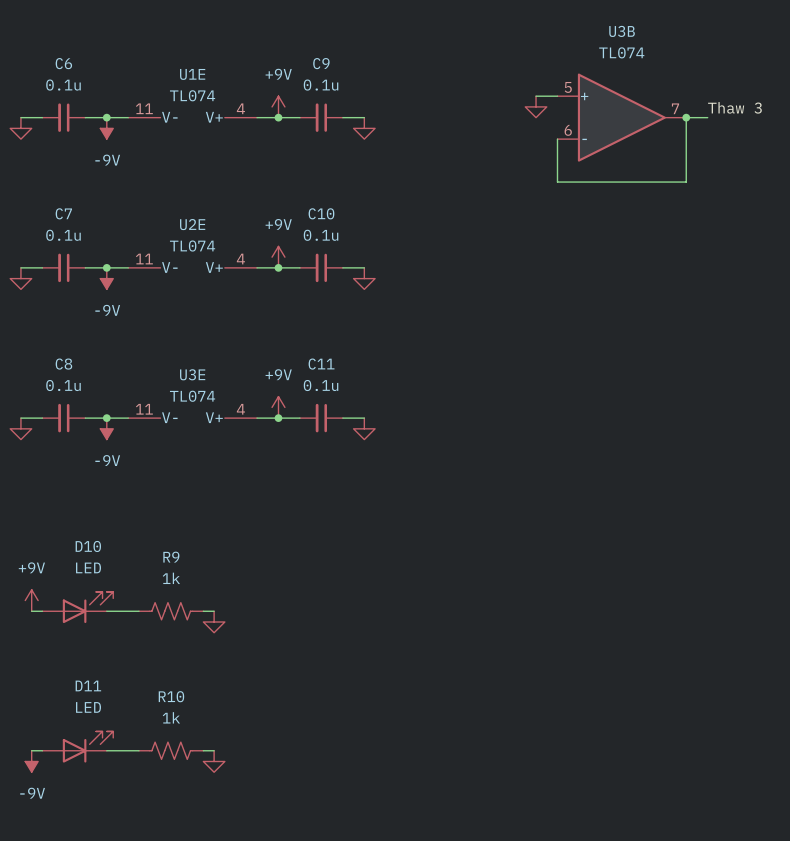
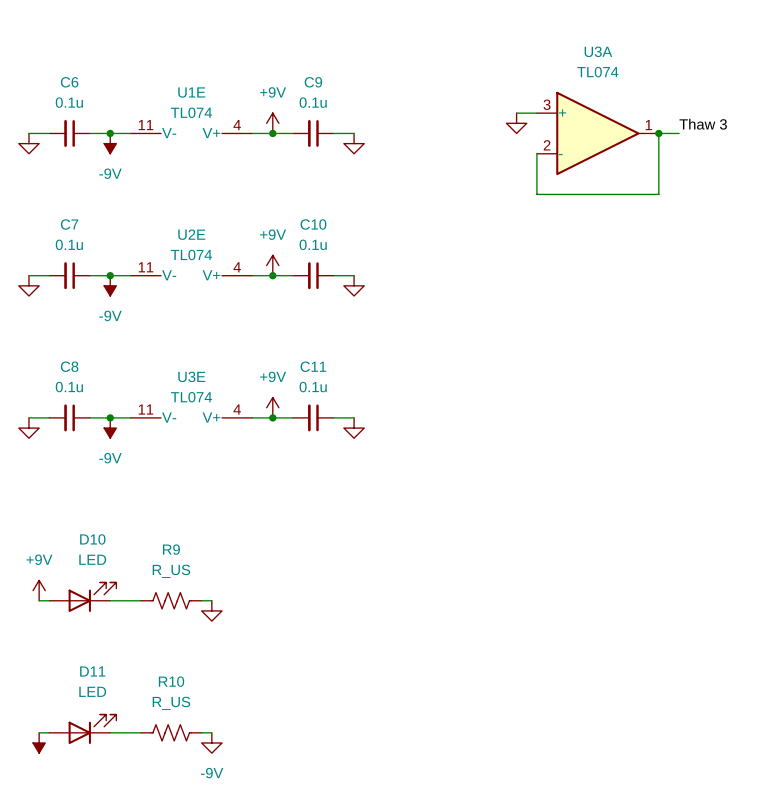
U3B name: U3B (622, 31) -> U3A (598, 51)
U3B pin number: 5 (568, 87) -> 3 (547, 104)
U3B pin number: 7 (675, 108) -> 1 (648, 125)
U3B pin number: 6 (568, 130) -> 2 (547, 145)
R9 value: 1k (171, 578) -> R_US (171, 571)
R10 value: 1k (171, 717) -> R_US (171, 703)
power symbol text: -9V (32, 793) -> none
power symbol text: none -> -9V (212, 773)

